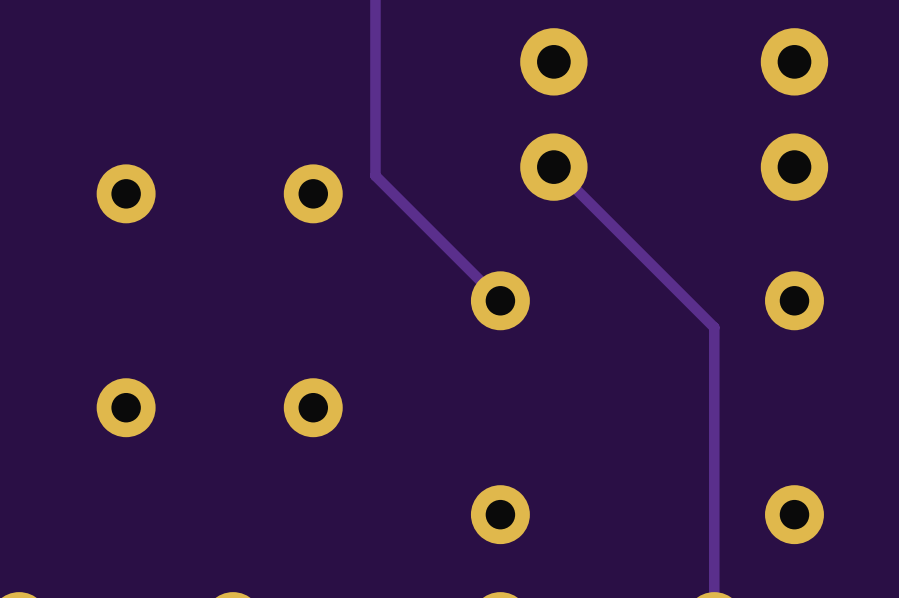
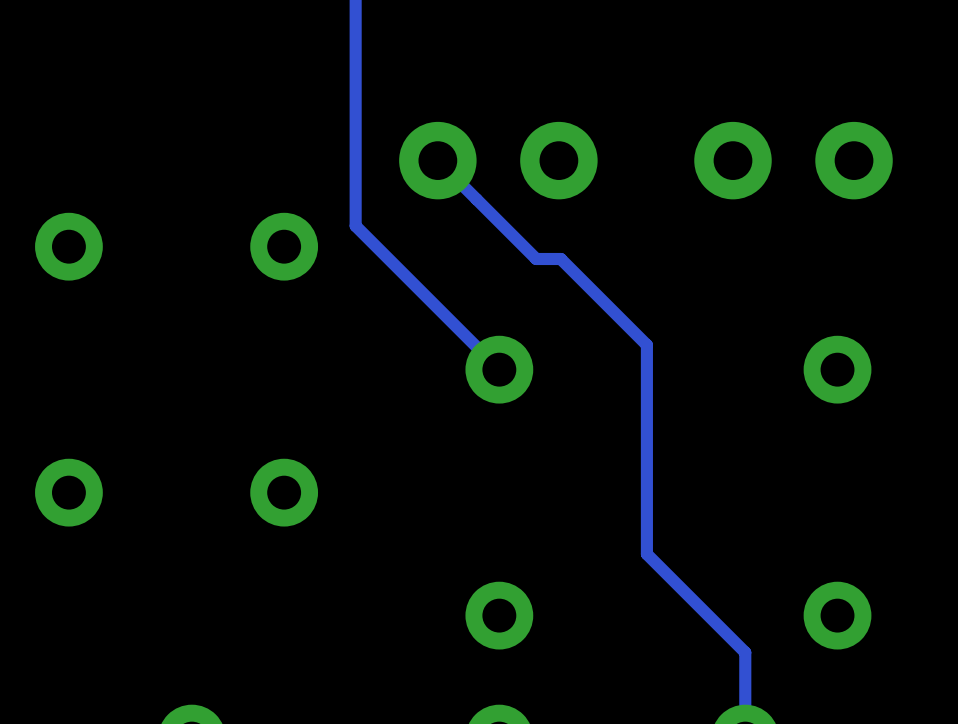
part rotation: 0° (553, 114) -> 90° clockwise (498, 160)
part rotation: 0° (794, 114) -> 90° clockwise (793, 160)
track: (553, 167) (714, 327) (714, 546) -> (437, 160) (536, 258) (560, 258) (646, 345) (646, 554) (745, 652)

